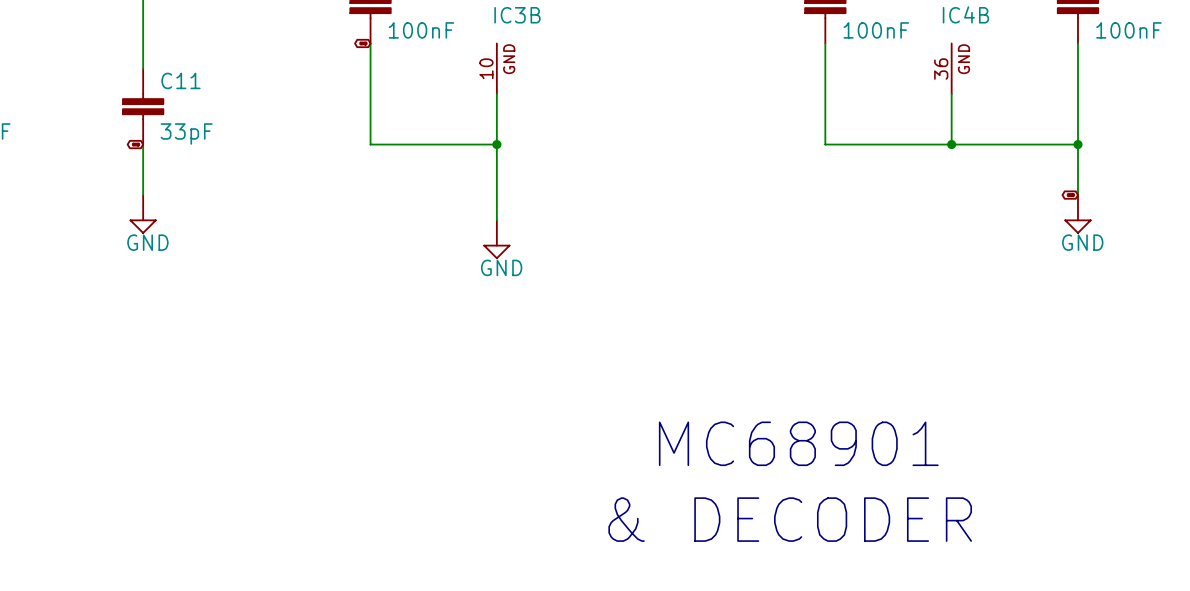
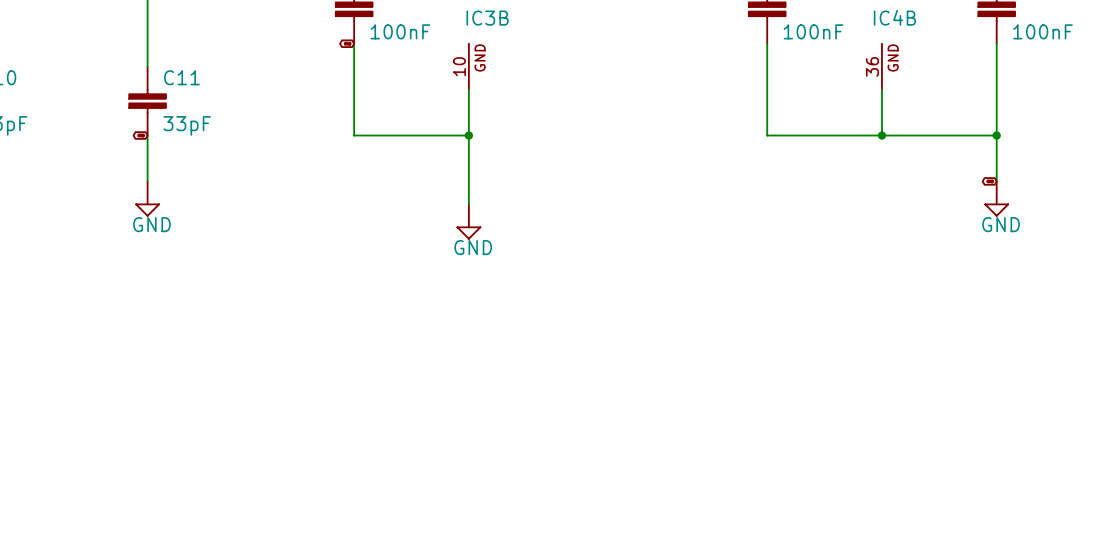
text: MC68901 (798, 443) -> none
text: & DECODER (790, 519) -> none

